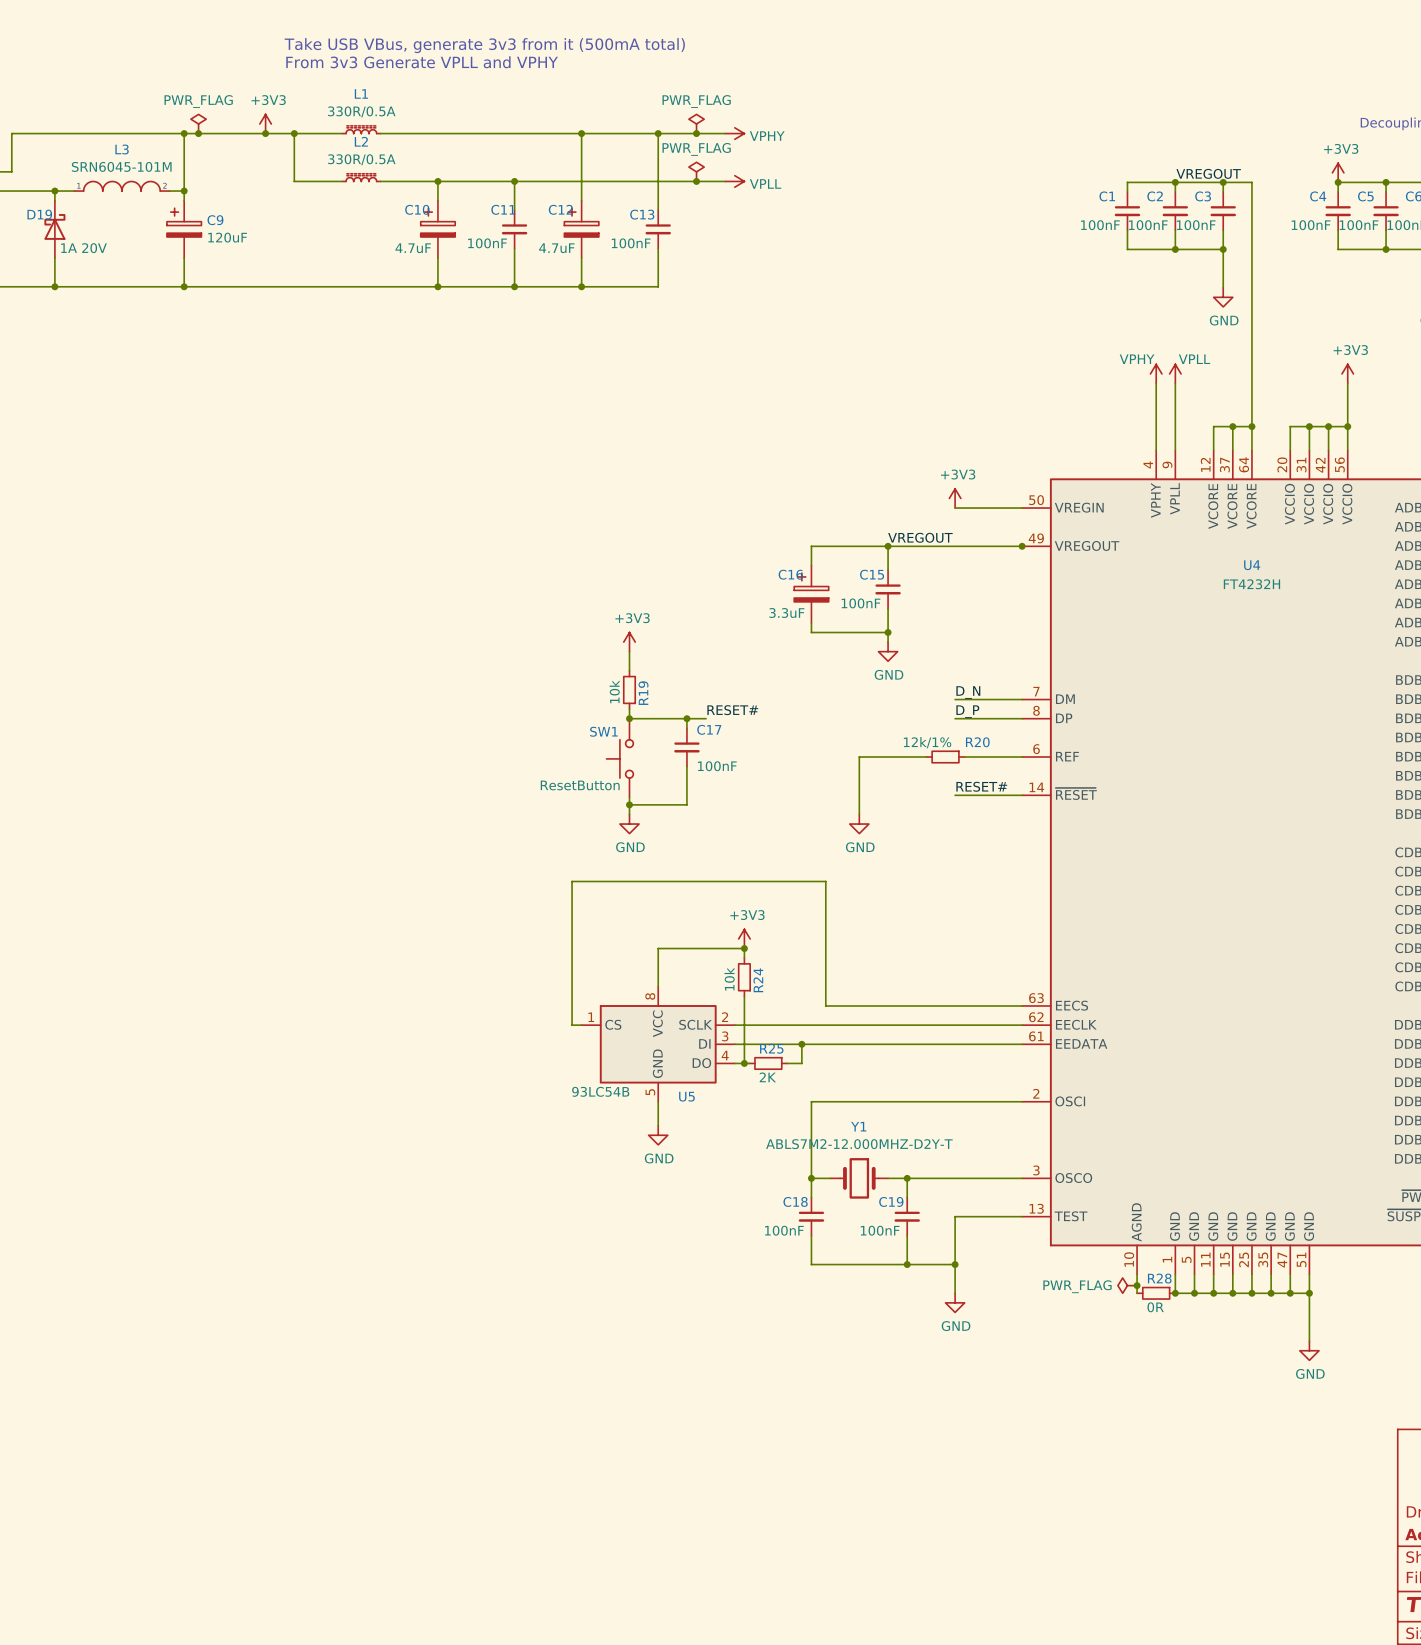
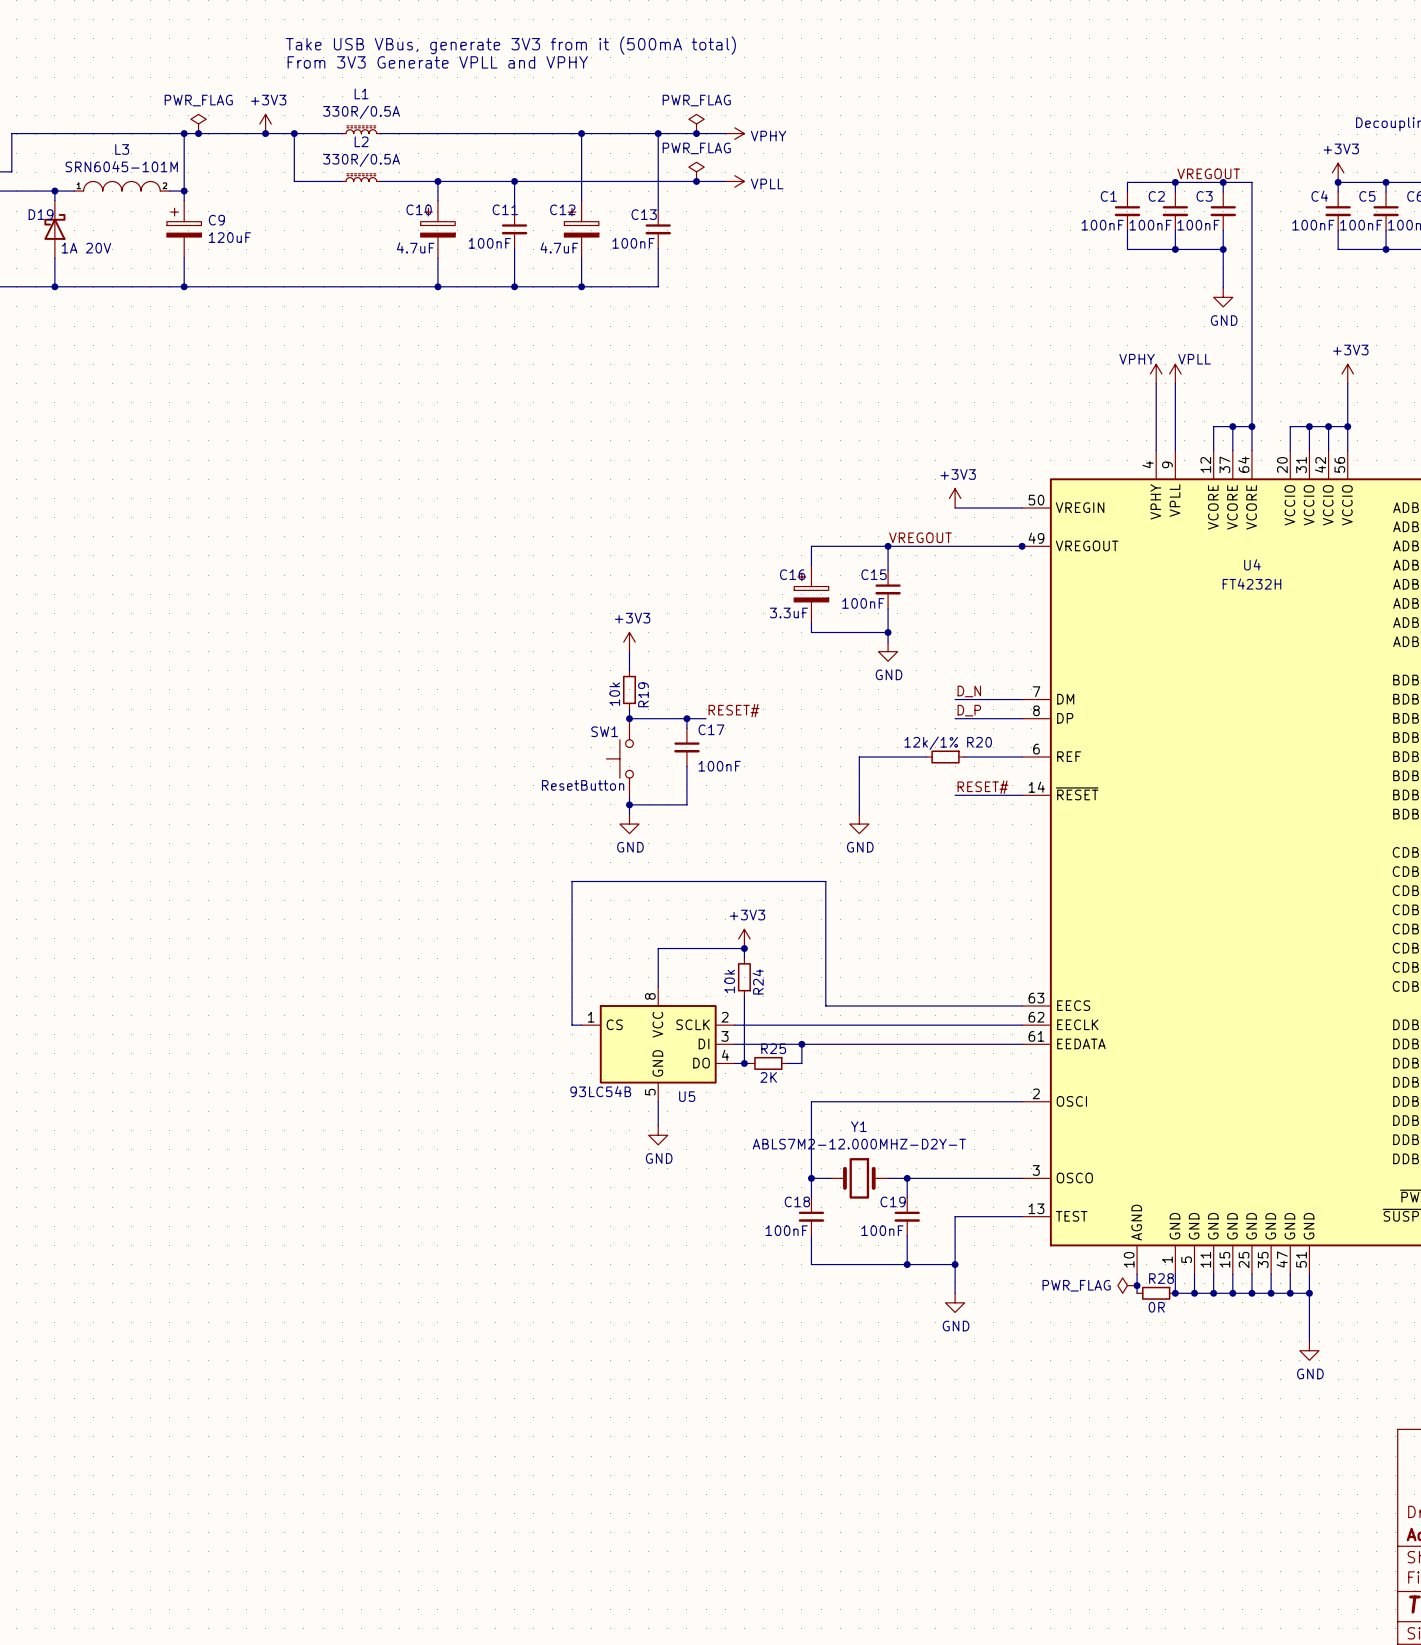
text: Take USB VBus, generate 3v3 from it (500mA total) (484, 45) -> Take USB VBus, generate 3V3 from it (500mA total) (510, 45)
text: From 3v3 Generate VPLL and VPHY (422, 62) -> From 3V3 Generate VPLL and VPHY (437, 62)

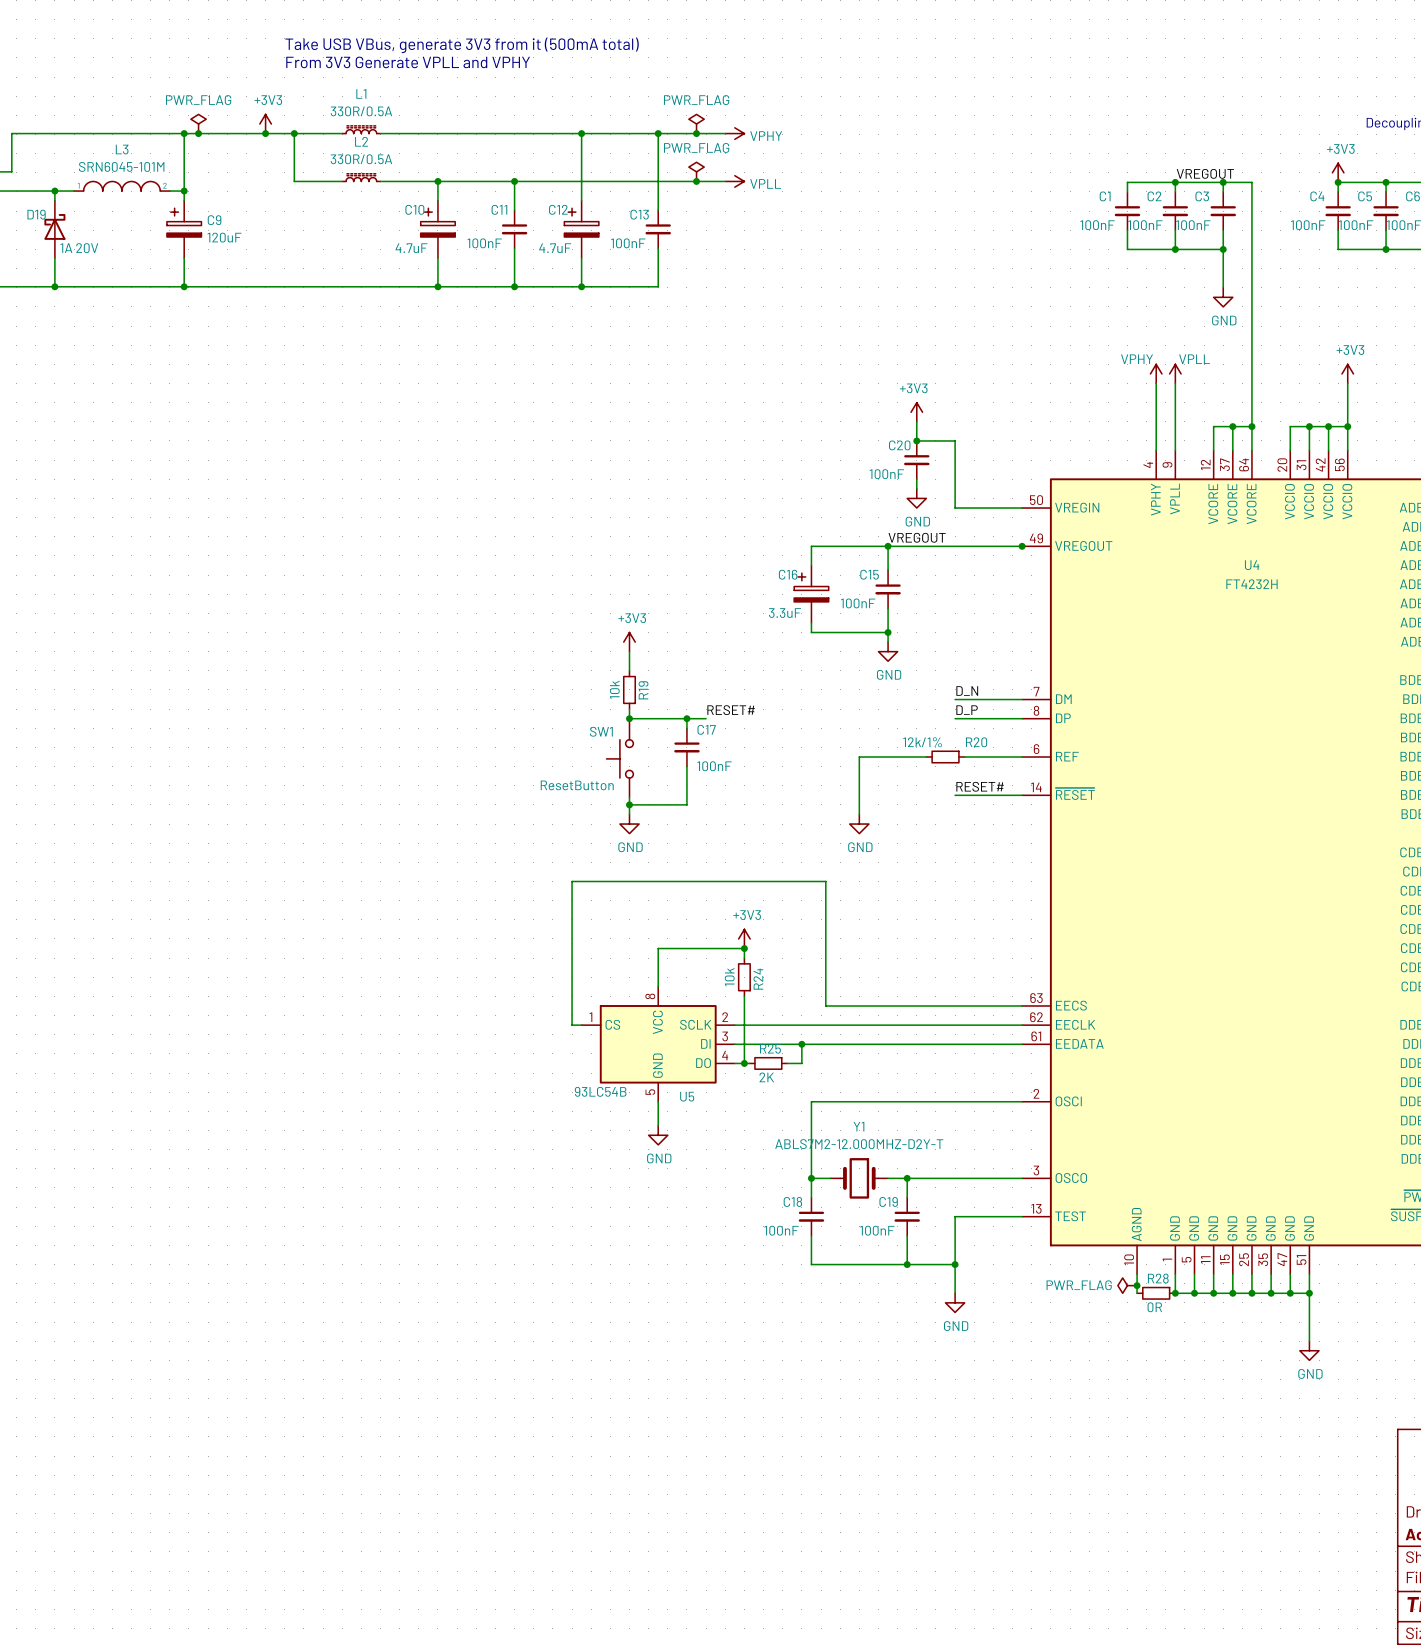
wire: none -> (916, 421) (916, 440) (955, 440) (955, 508)
junction: none -> (916, 440)
C20: none -> 100nF (916, 460)
power symbol text position: +3V3 (958, 474) -> +3V3 (913, 388)
wire: none -> (916, 479) (916, 488)
power symbol: none -> GND (916, 498)
power symbol position: +3V3 (955, 498) -> +3V3 (916, 412)

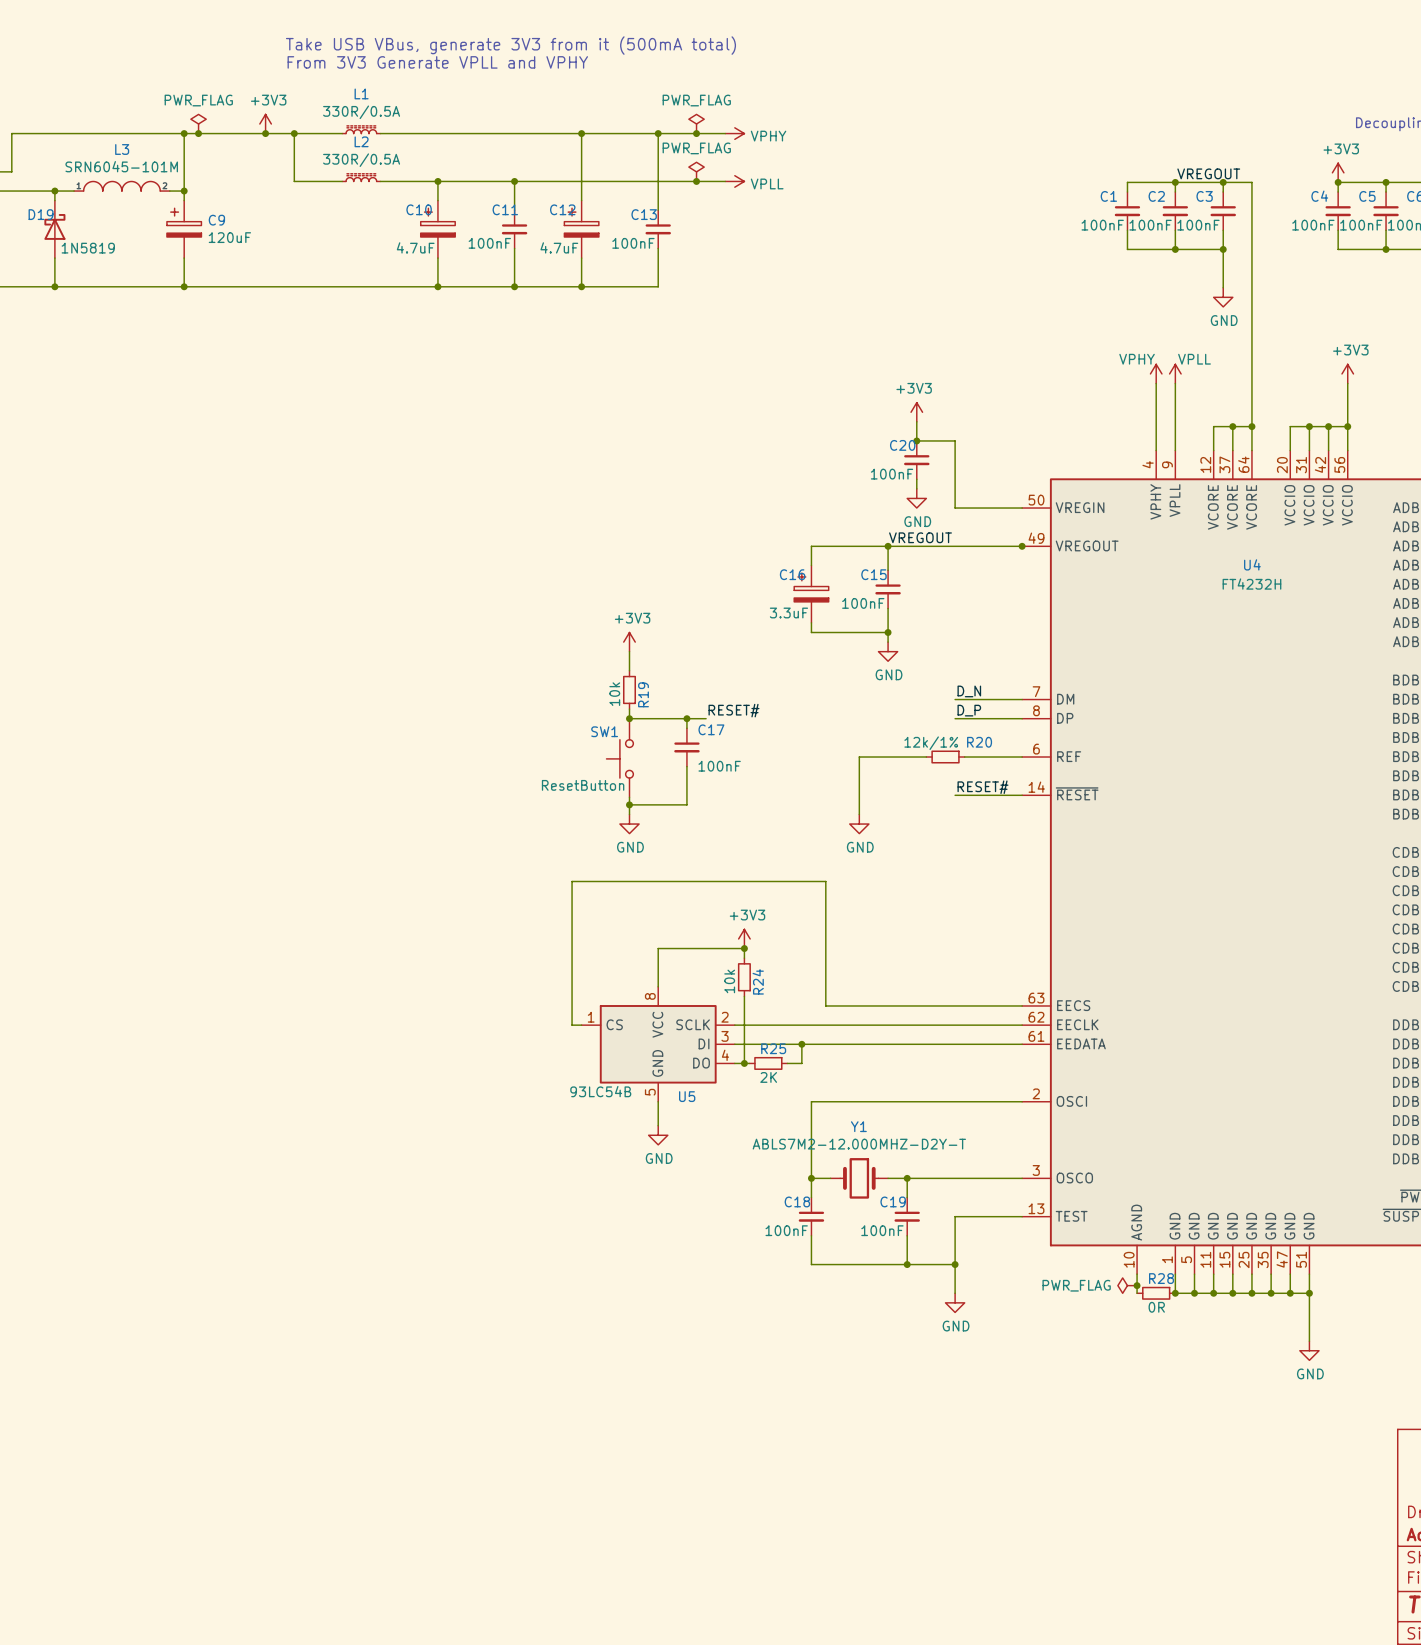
D19 value: 1A 20V (79, 248) -> 1N5819 (88, 248)

